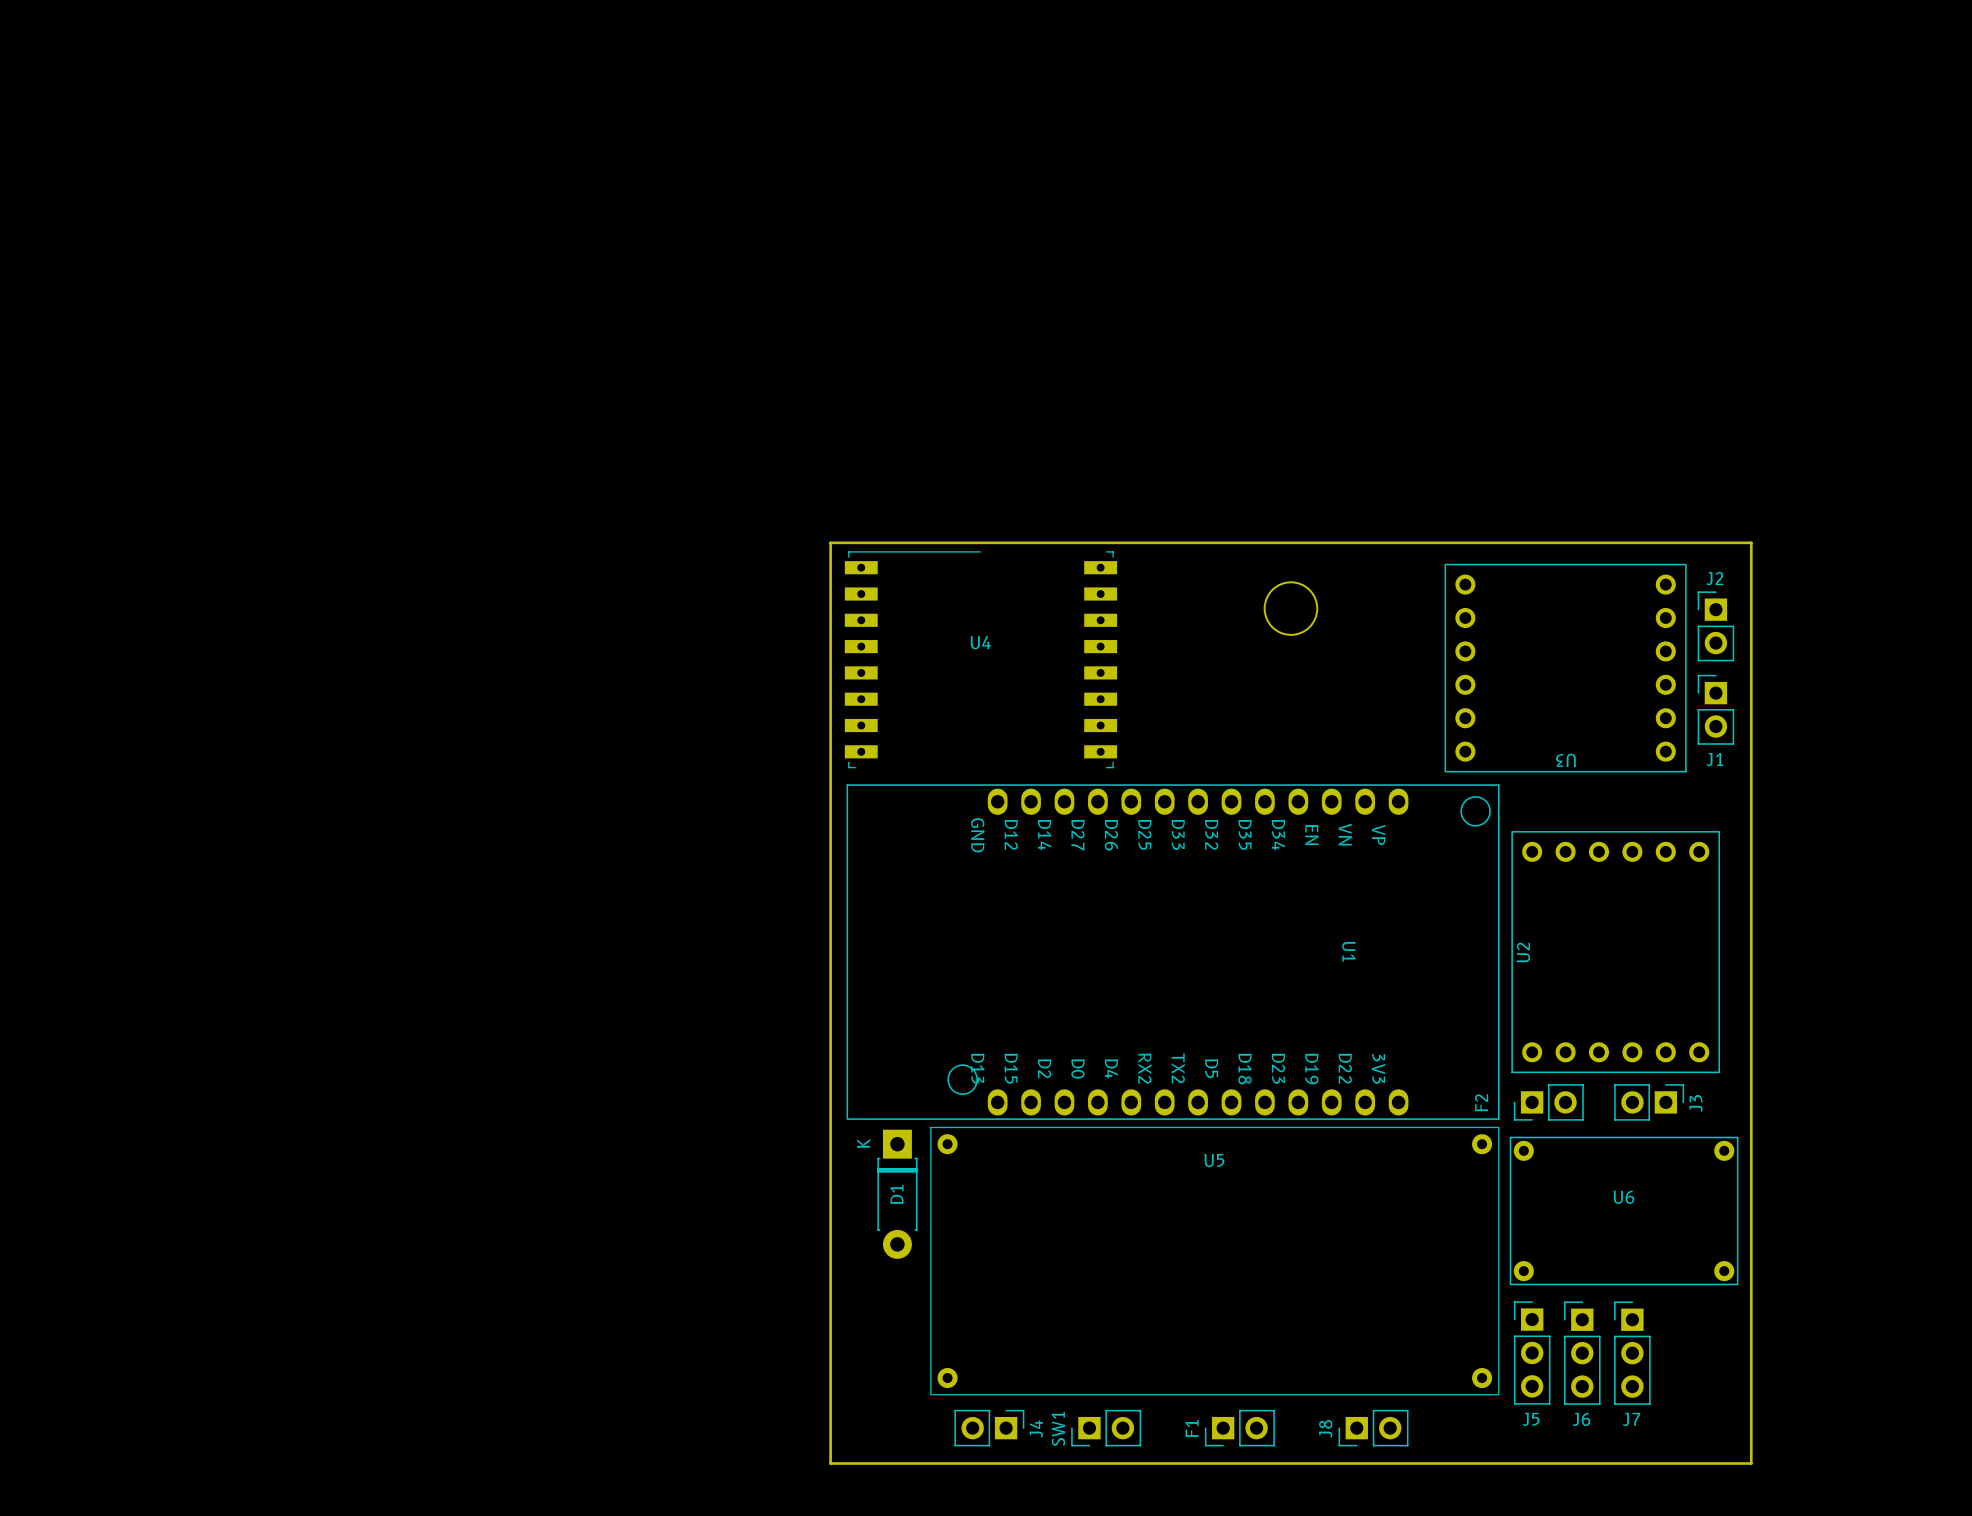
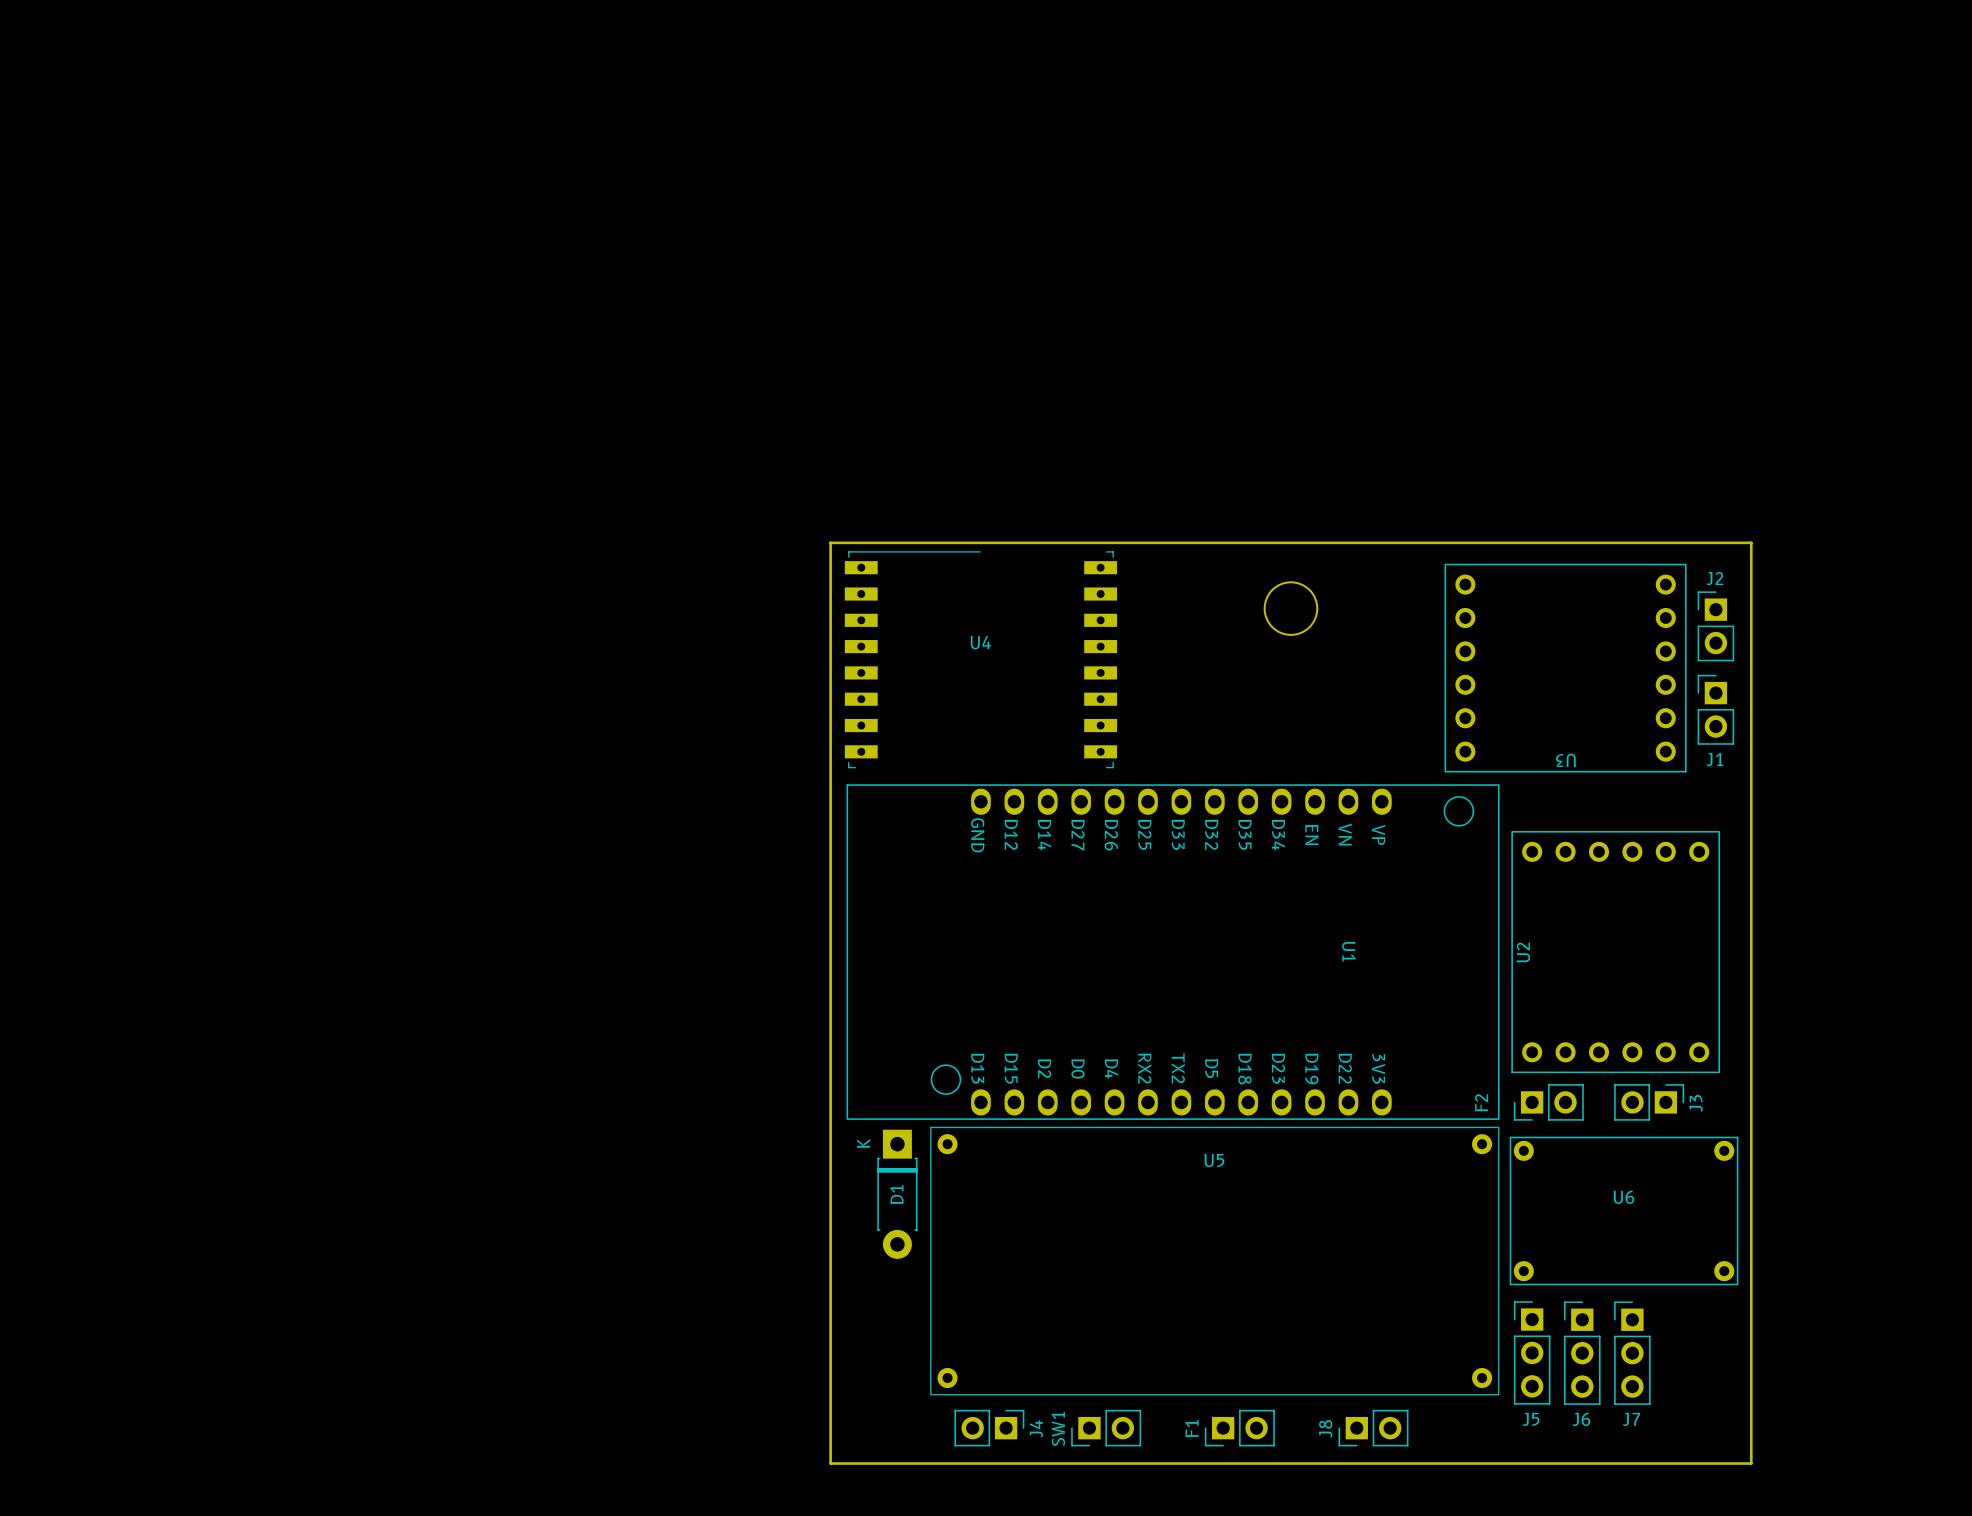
U1 footprint: [846, 784, 1500, 1120] -> [846, 784, 1500, 1120]

